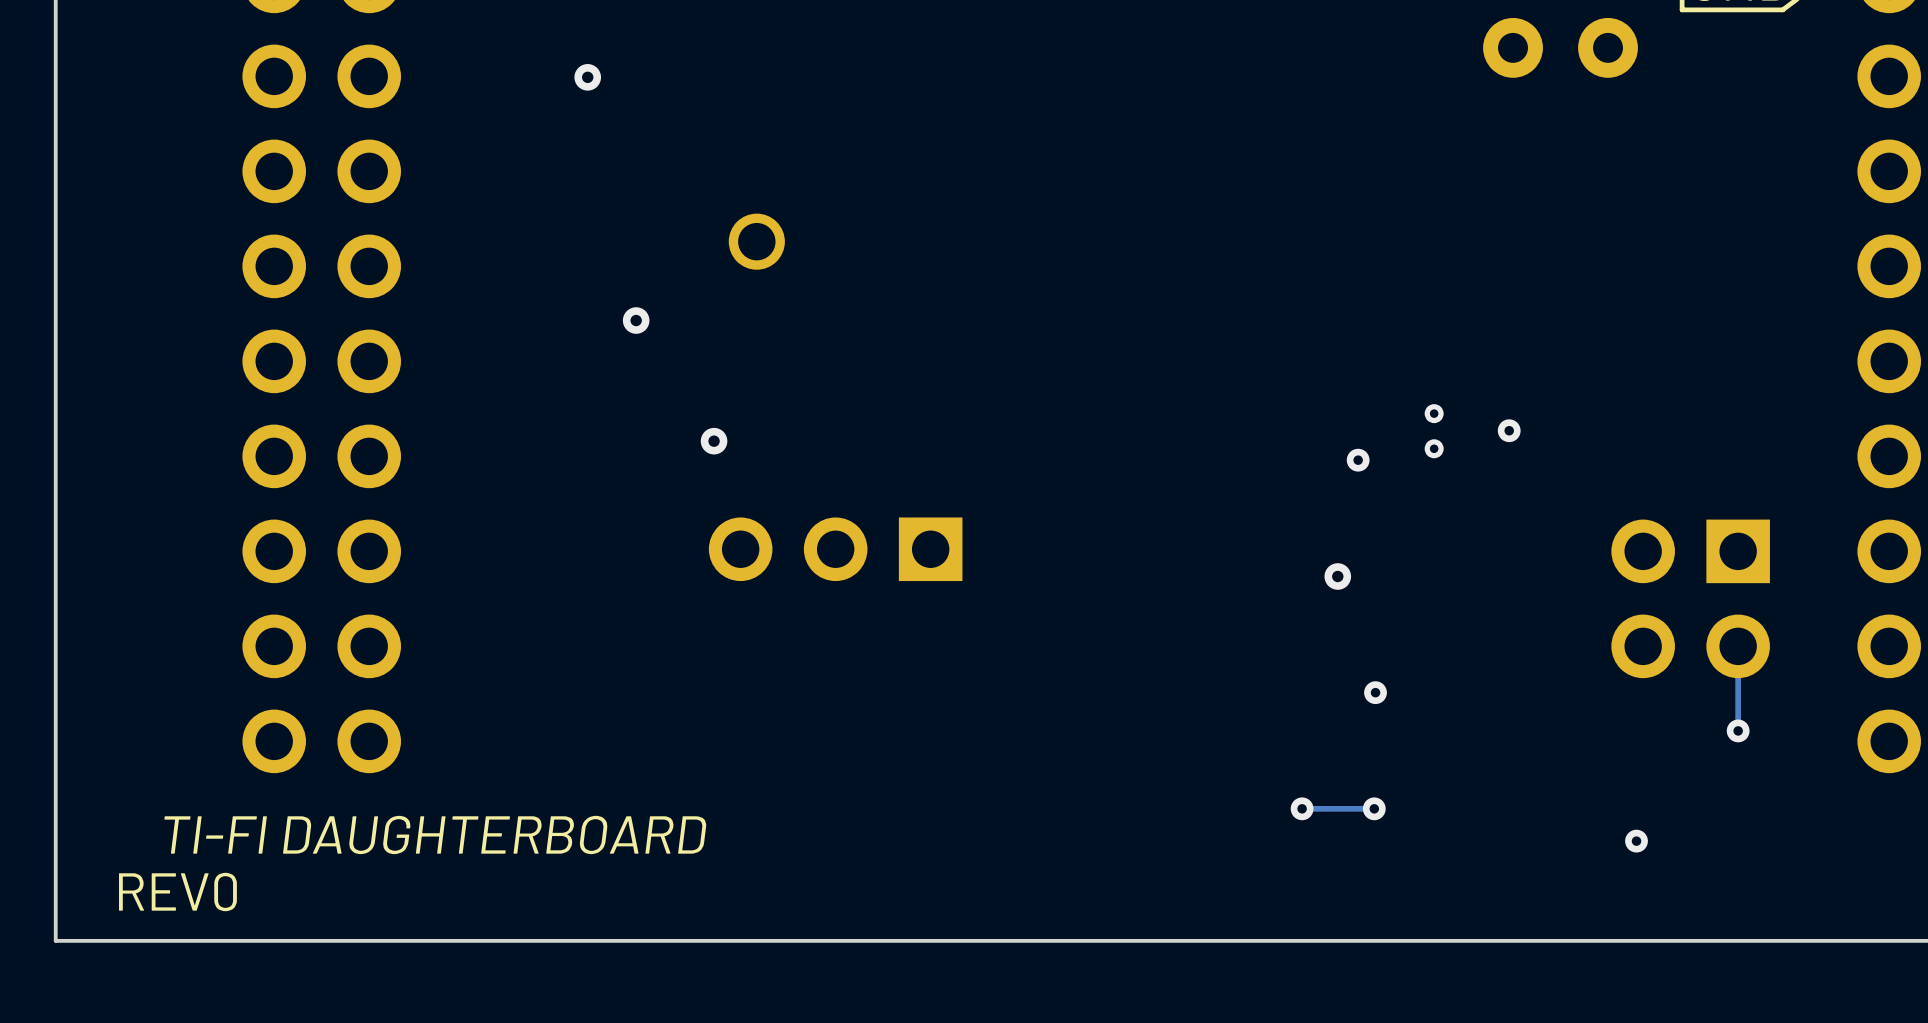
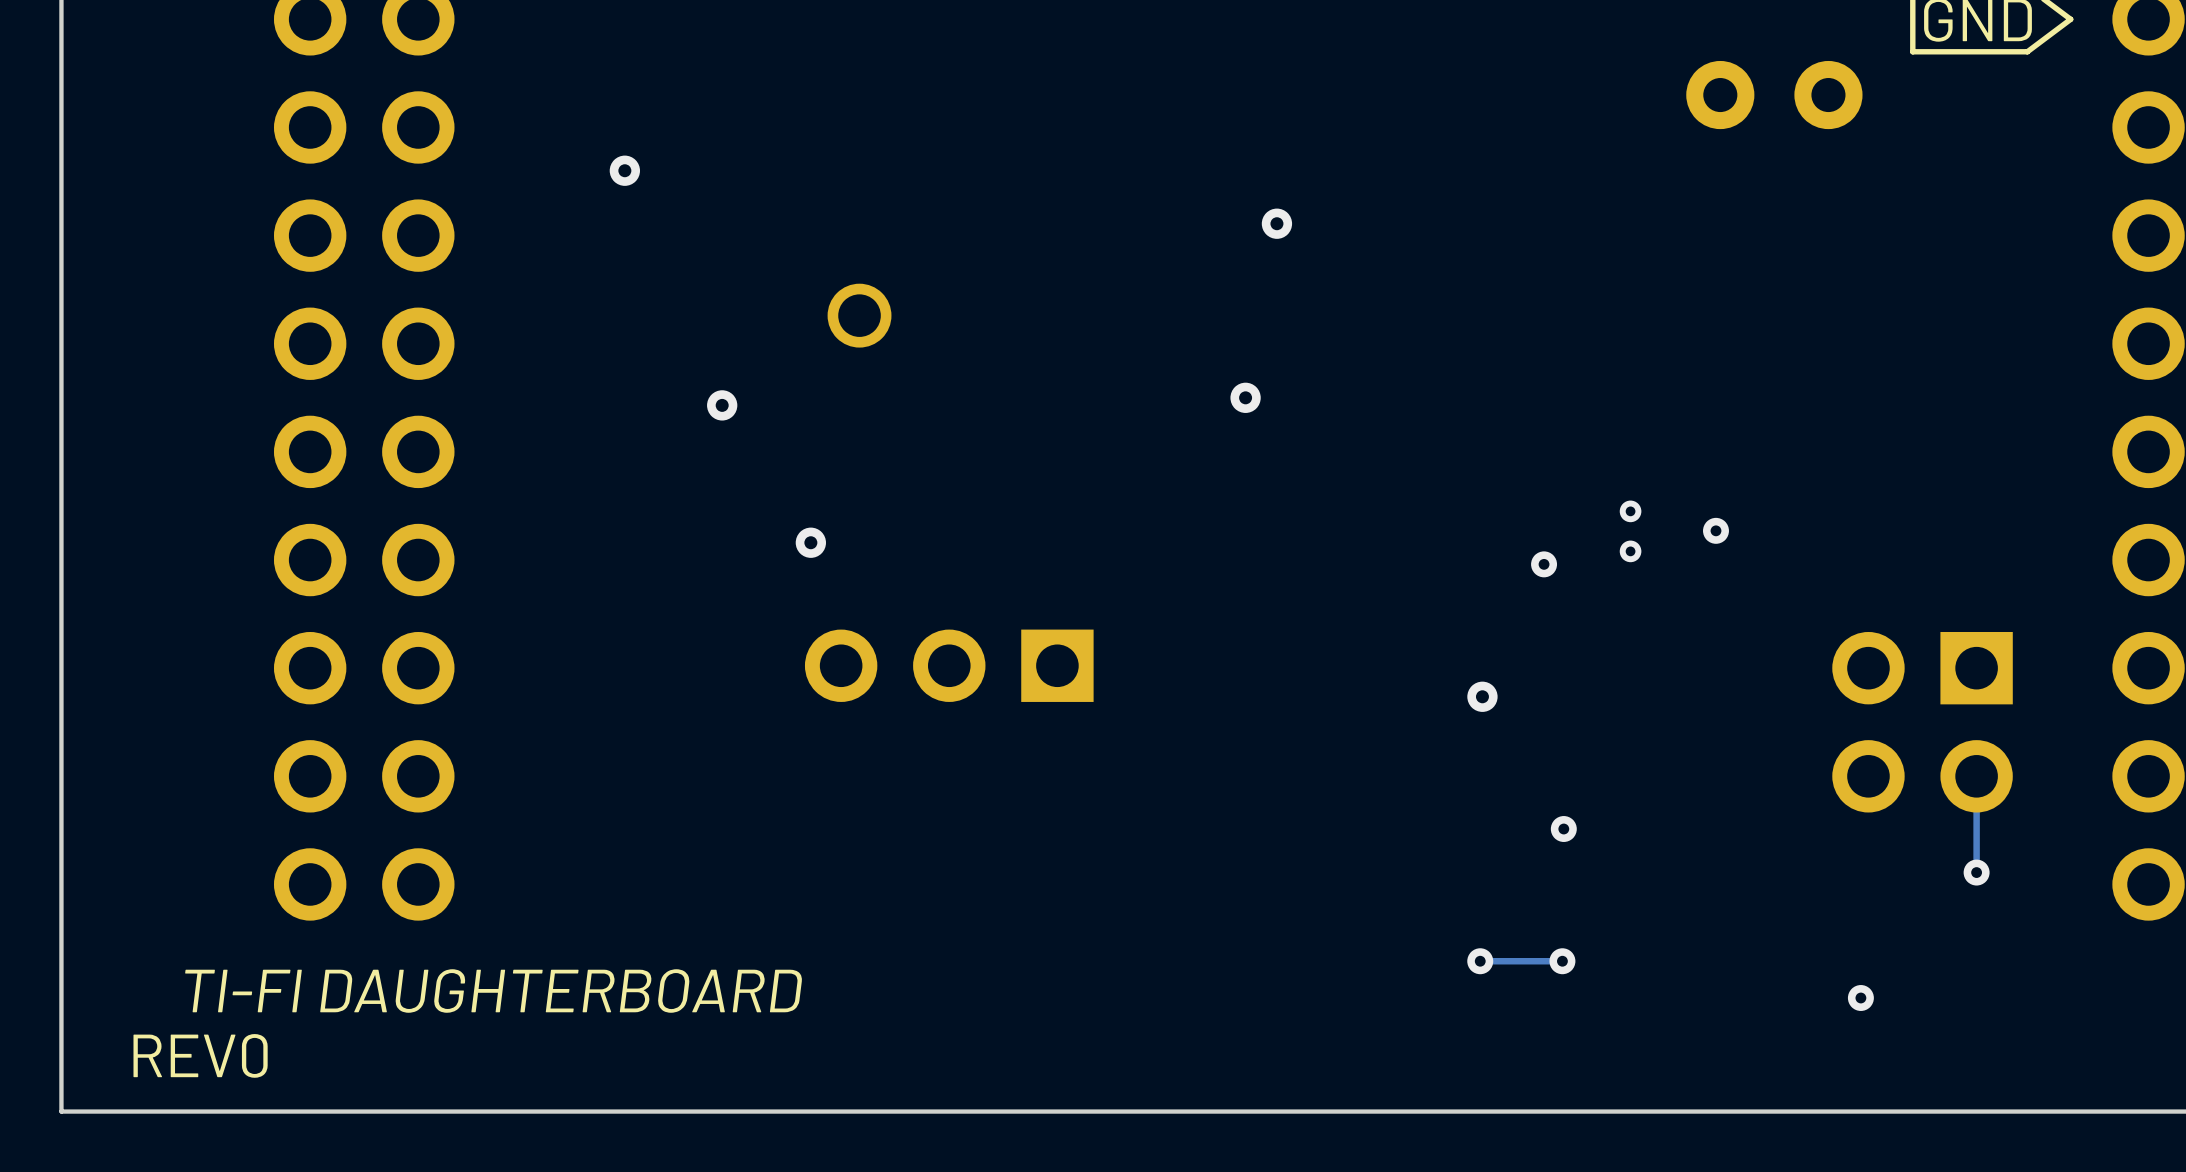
via position: (587, 77) -> (624, 170)
via: none -> (1276, 223)
via: none -> (1245, 397)
via position: (1337, 576) -> (1482, 696)

